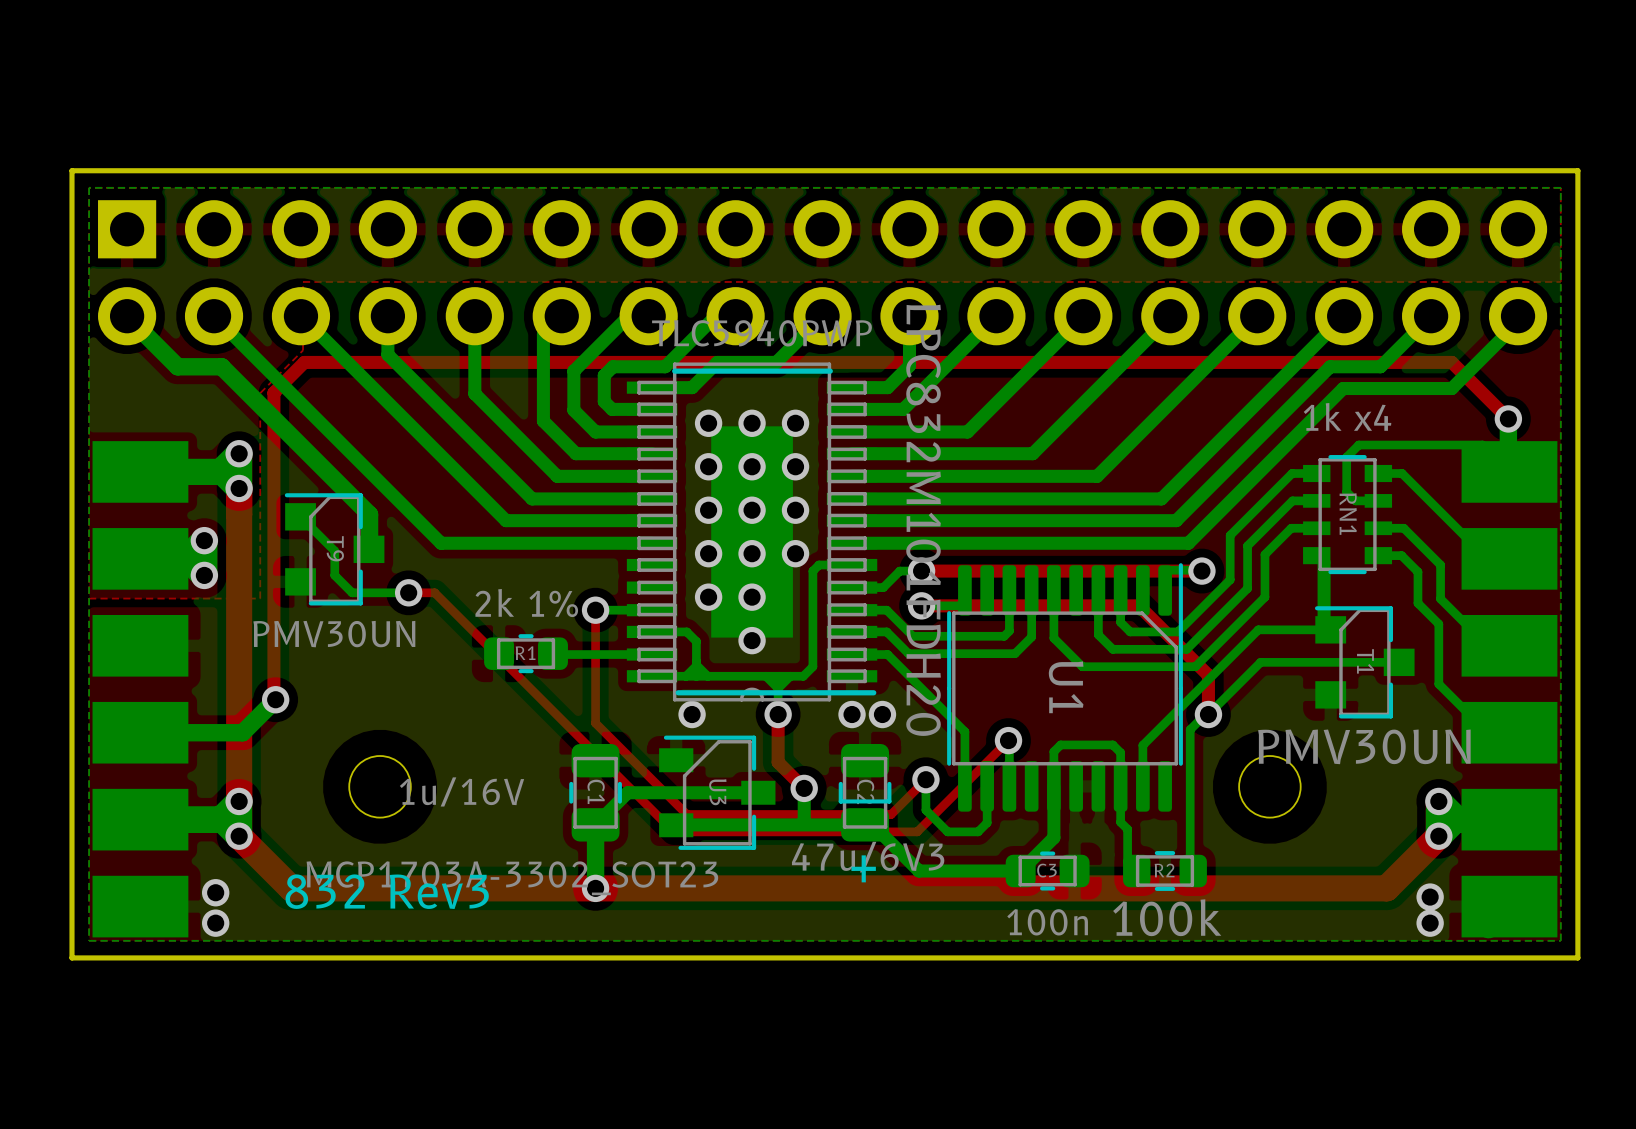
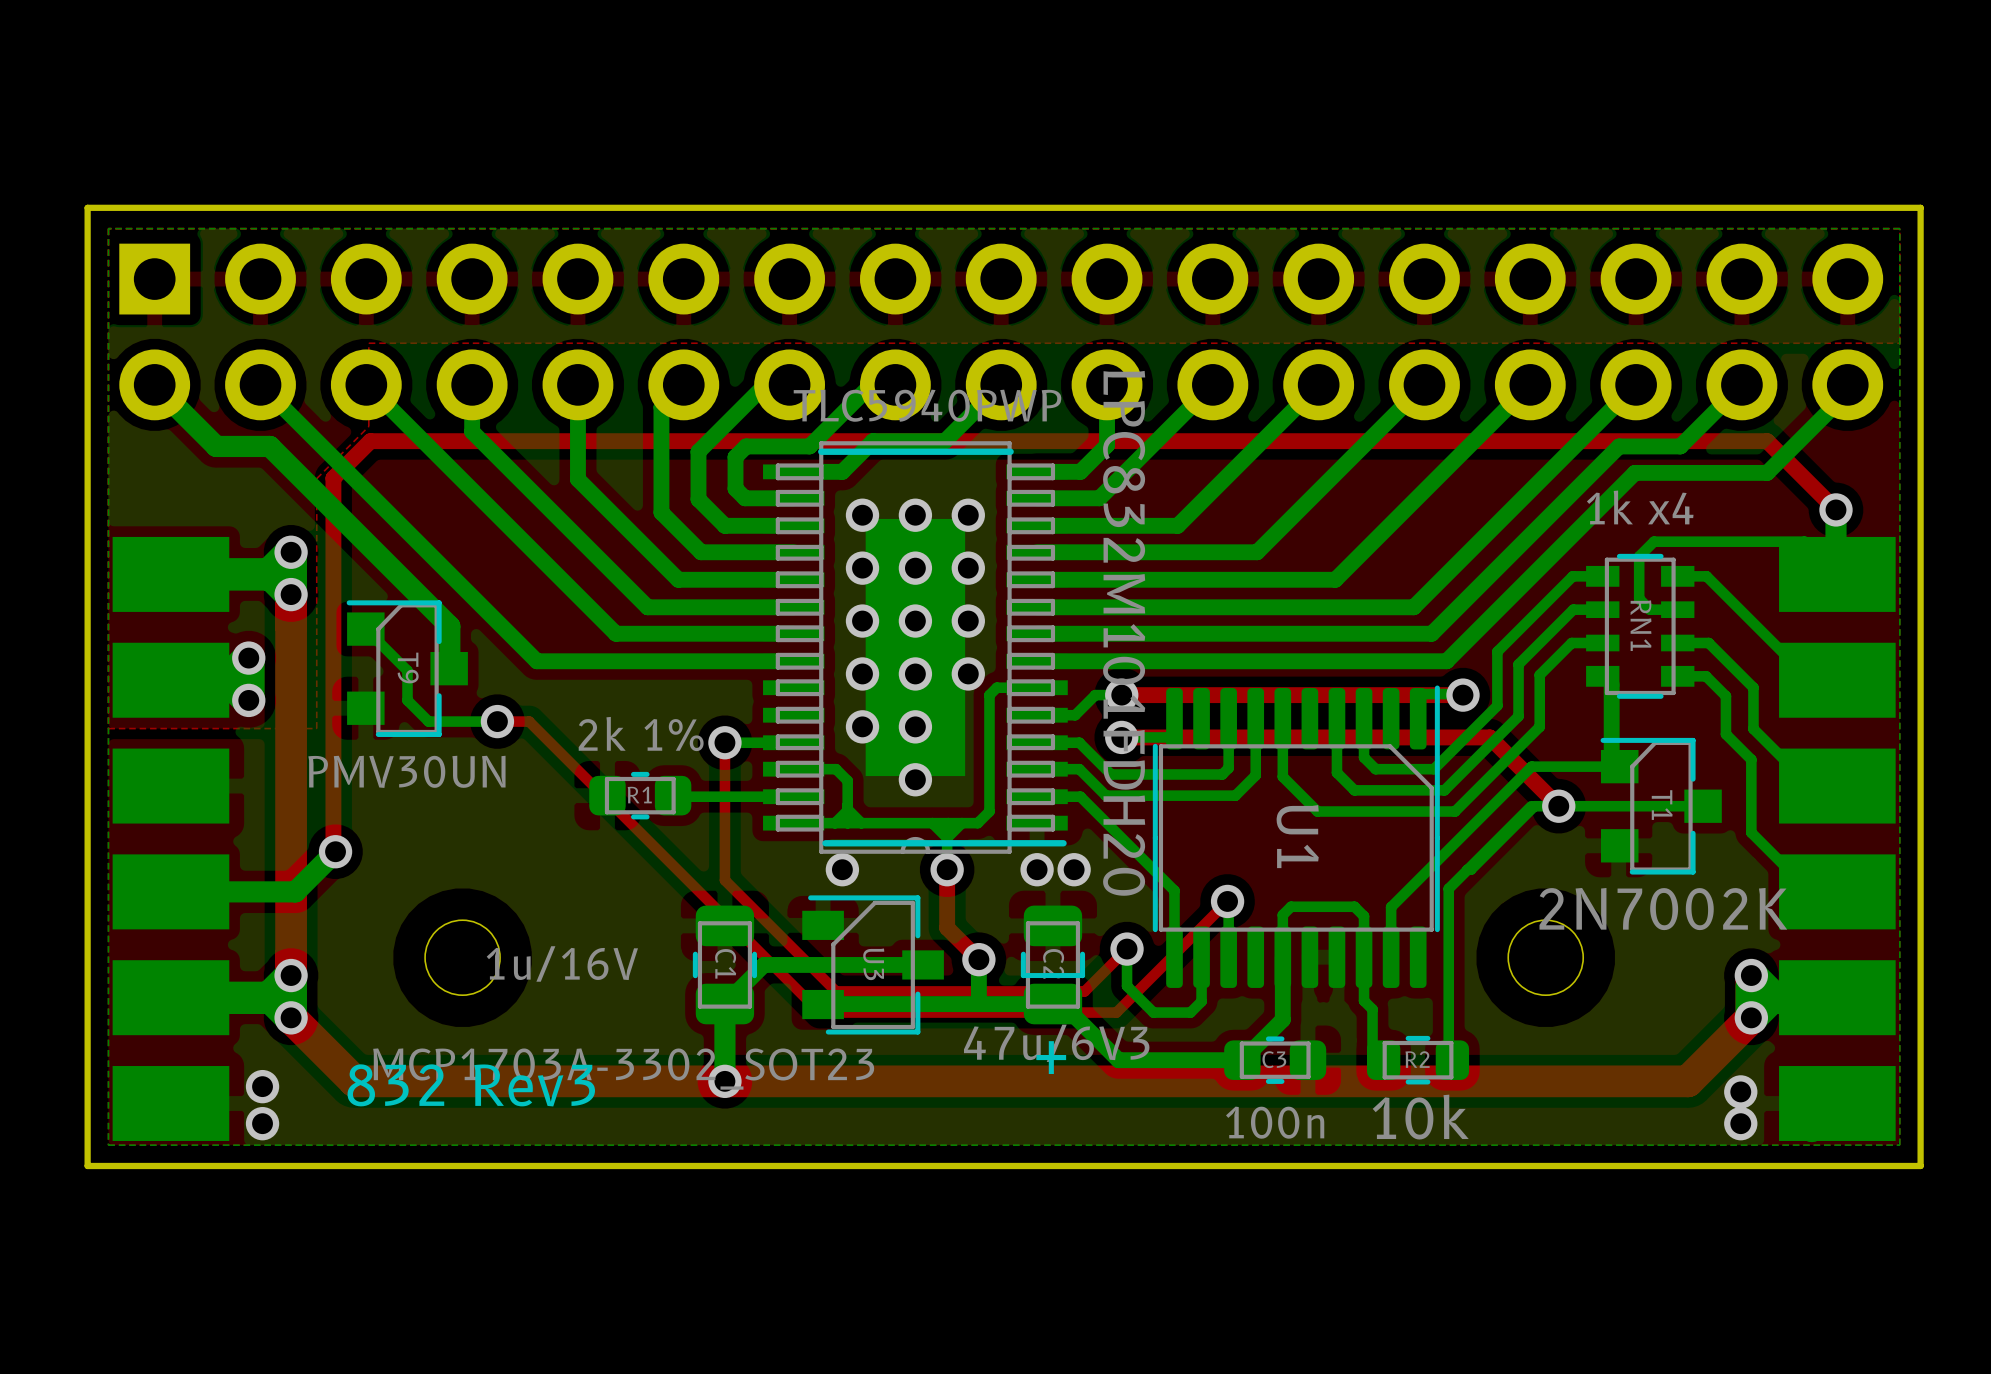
top track: (1138, 605) (1208, 675) (1208, 714) -> (1386, 737) (1489, 737) (1558, 806)
via position: (1208, 714) -> (1558, 806)
T1 value: PMV30UN (1364, 746) -> 2N7002K (1663, 909)
R2 value: 100k (1167, 917) -> 10k (1420, 1117)

